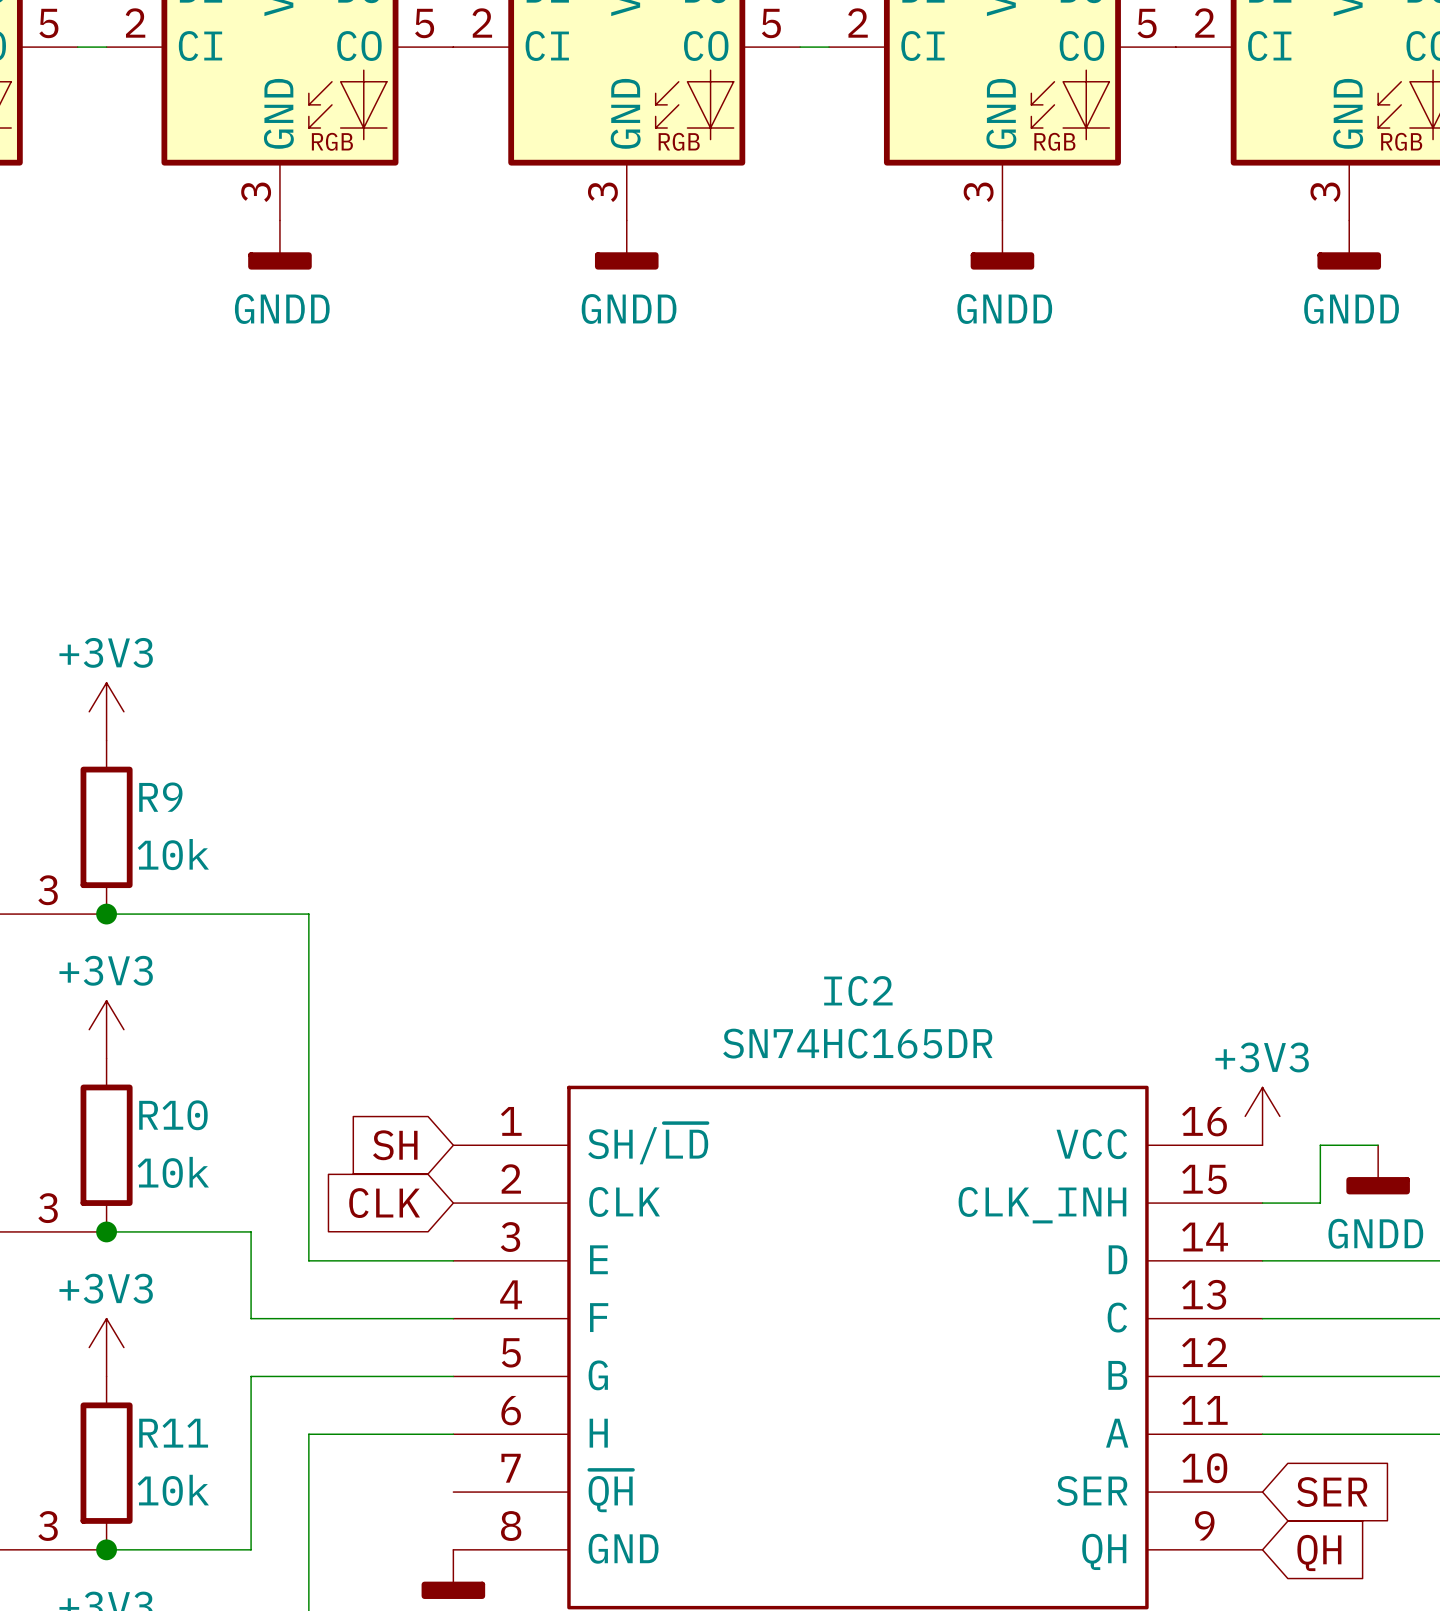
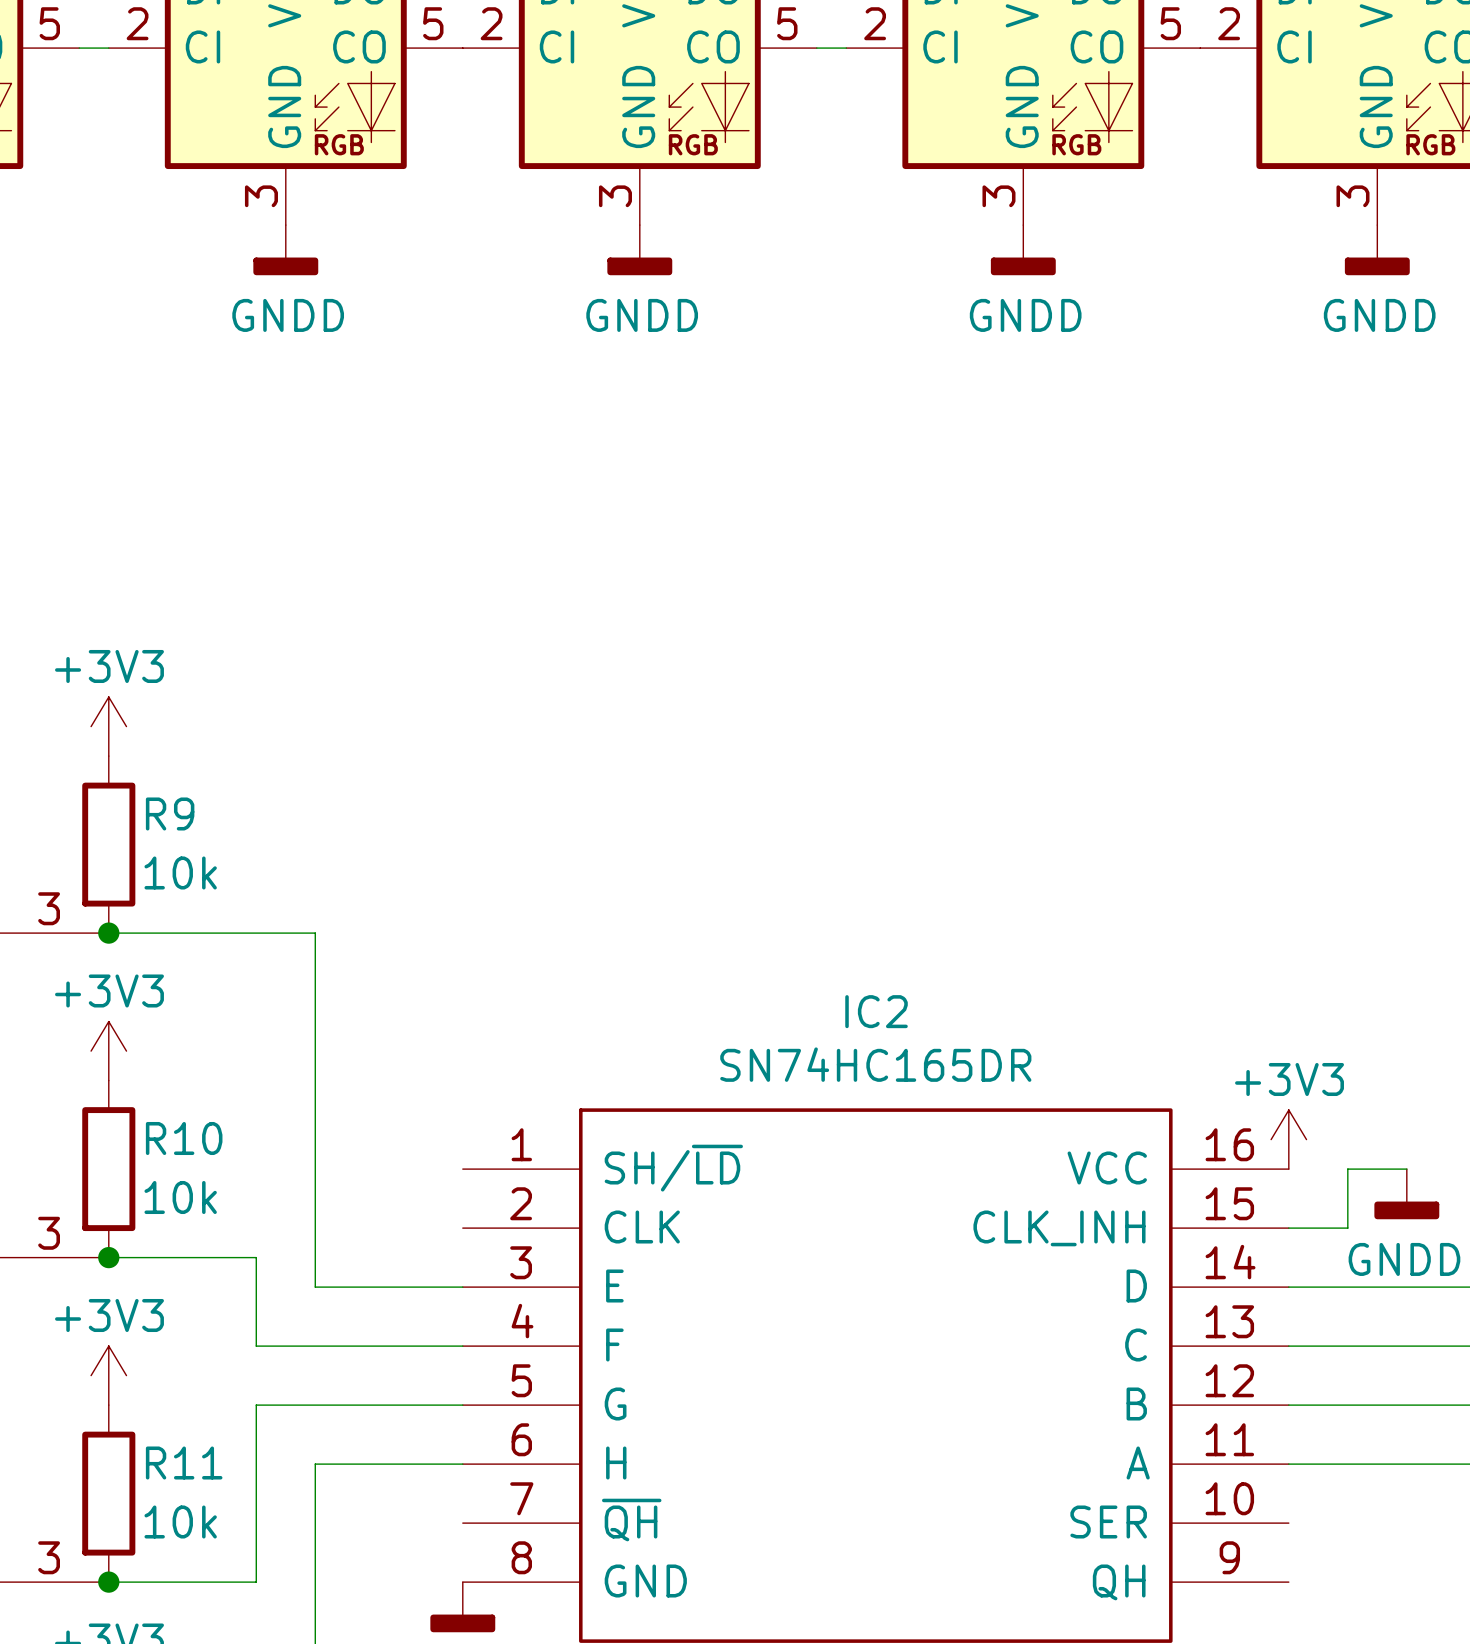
global label: SH (395, 1145) -> none
global label: CLK (384, 1203) -> none
global label: SER (1332, 1492) -> none
global label: QH (1319, 1552) -> none

